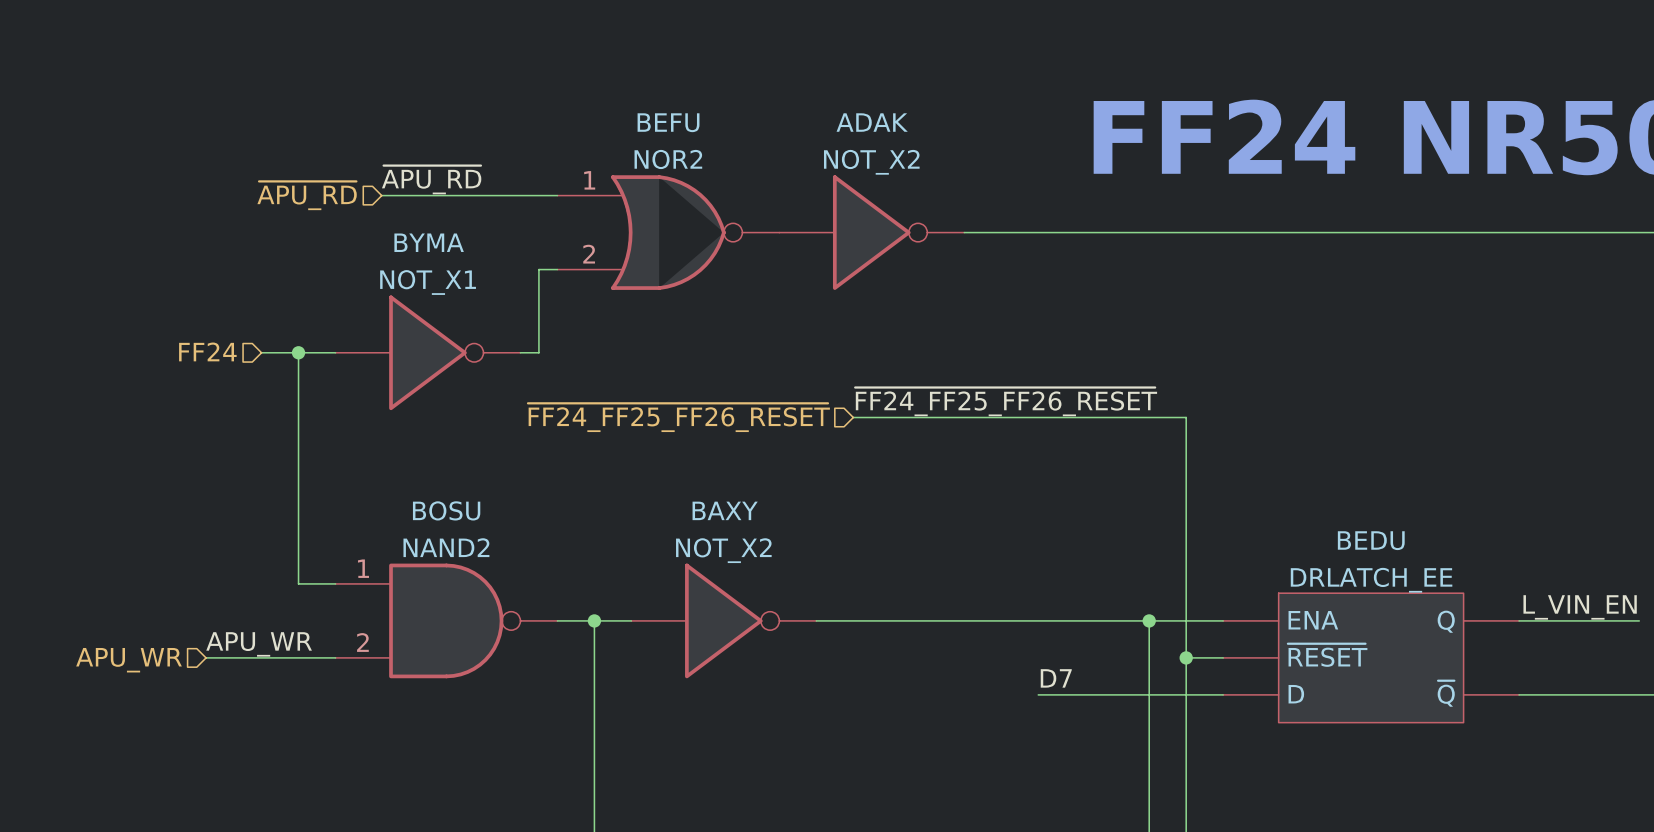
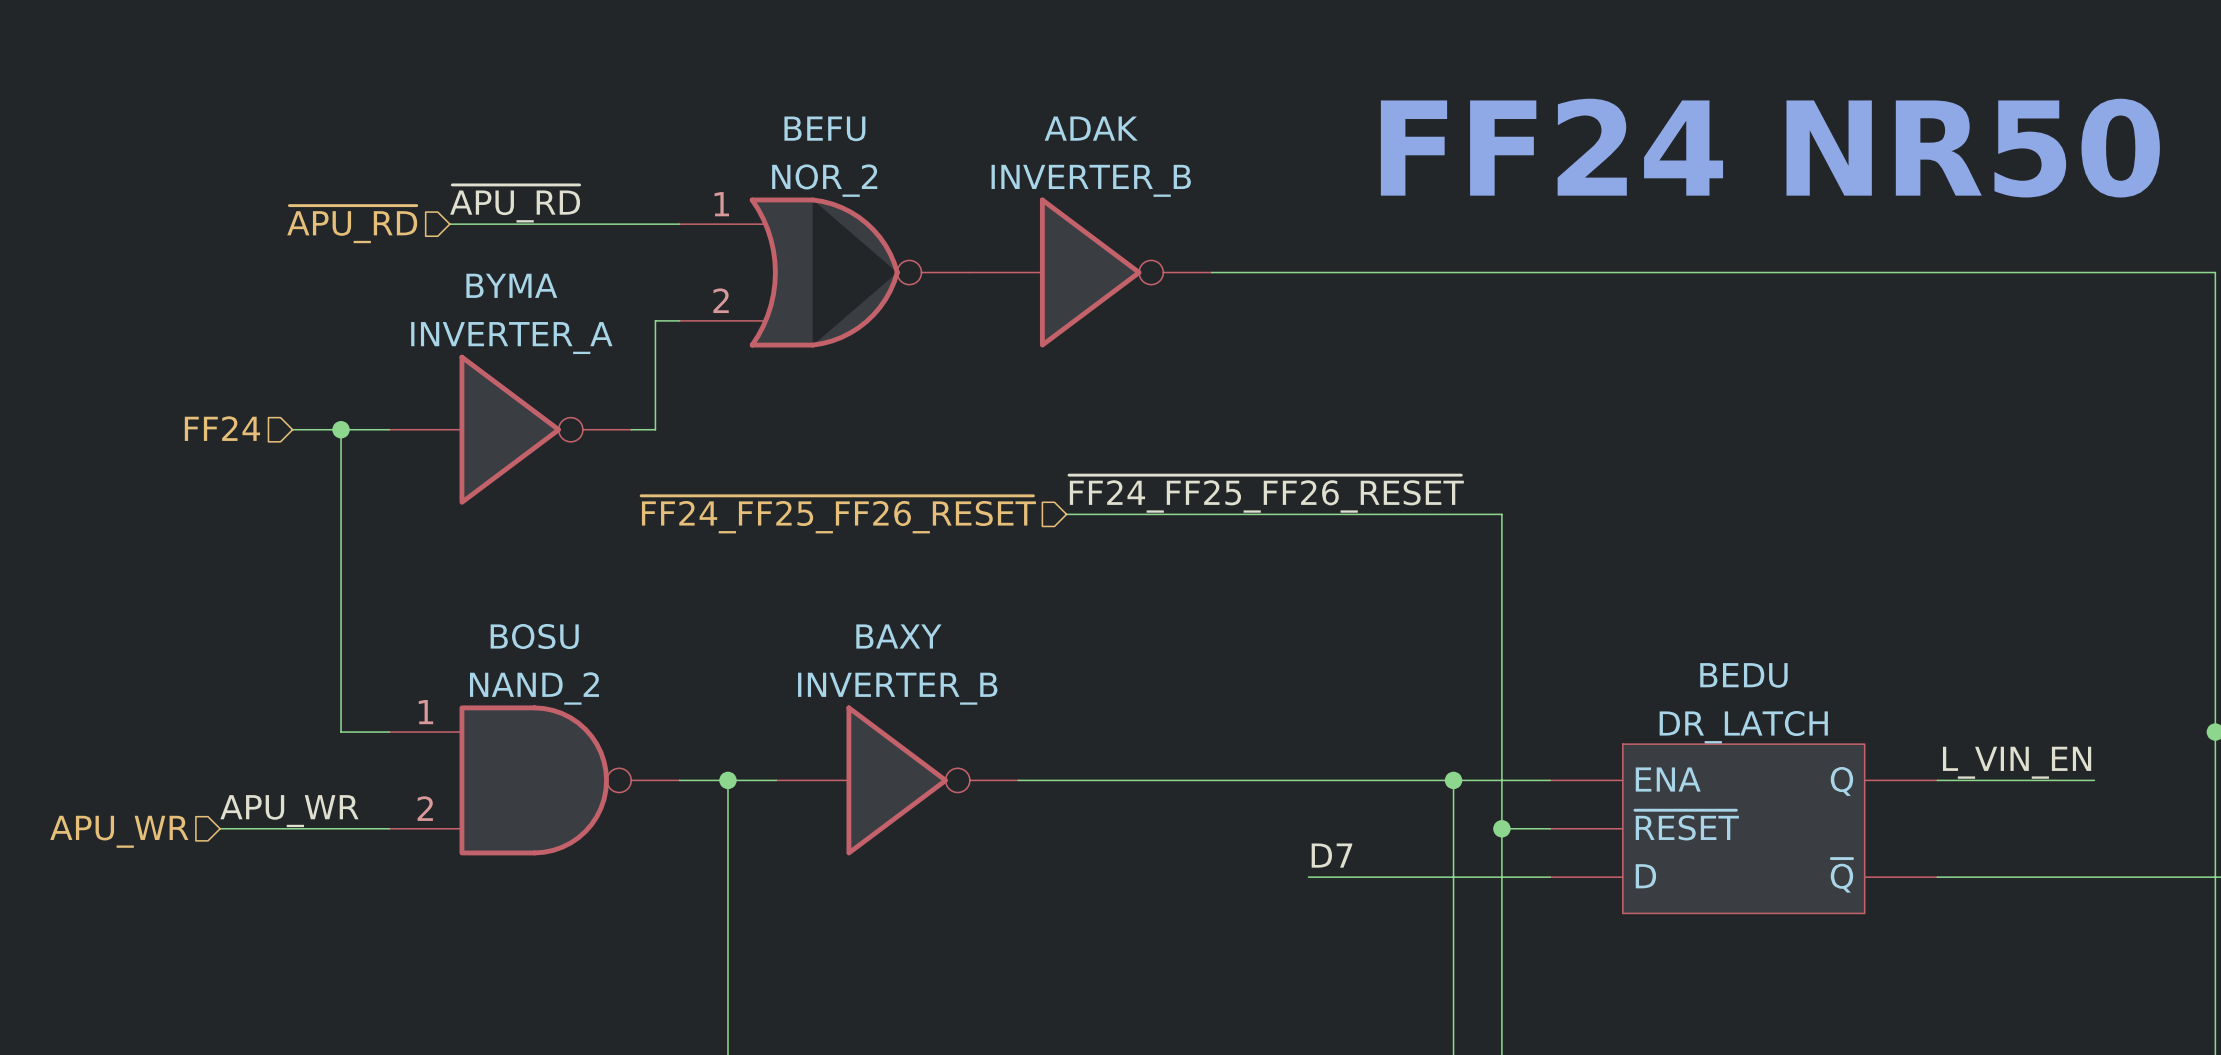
BEFU value: NOR2 (668, 159) -> NOR_2 (824, 180)
ADAK value: NOT_X2 (871, 162) -> INVERTER_B (1091, 180)
BYMA value: NOT_X1 (428, 282) -> INVERTER_A (511, 338)
BOSU value: NAND2 (446, 547) -> NAND_2 (534, 688)
BAXY value: NOT_X2 (723, 550) -> INVERTER_B (897, 688)
BEDU value: DRLATCH_EE (1371, 580) -> DR_LATCH (1743, 727)

